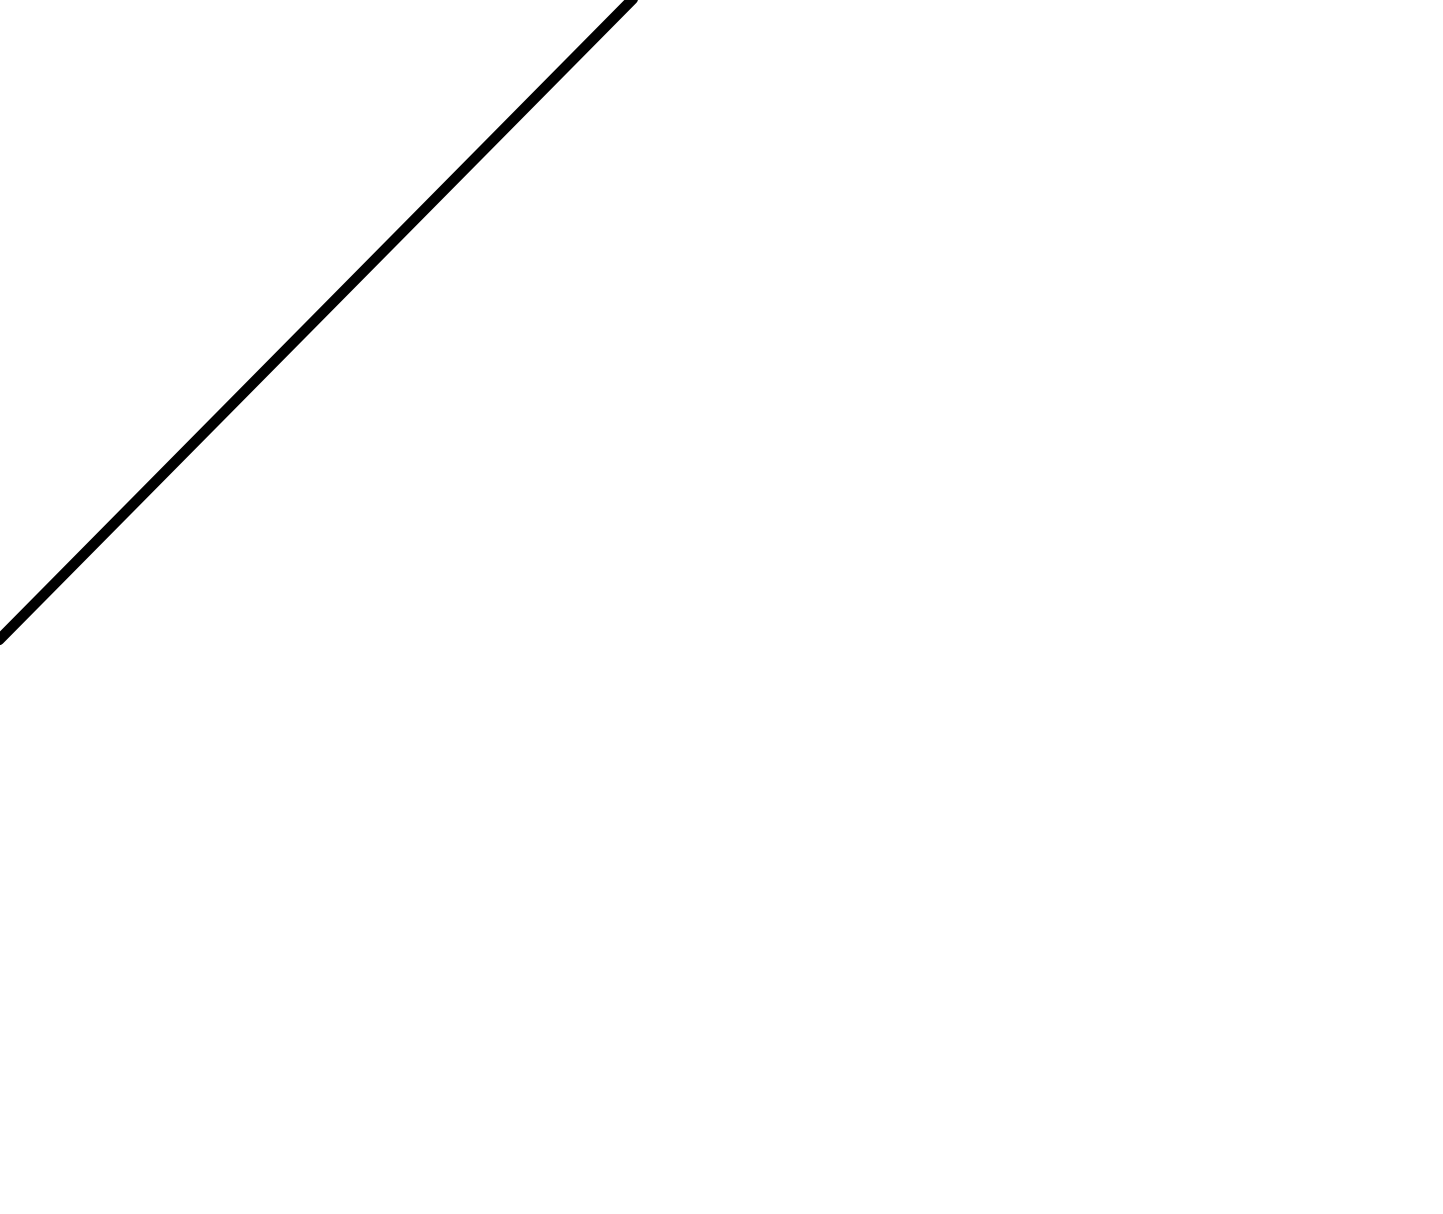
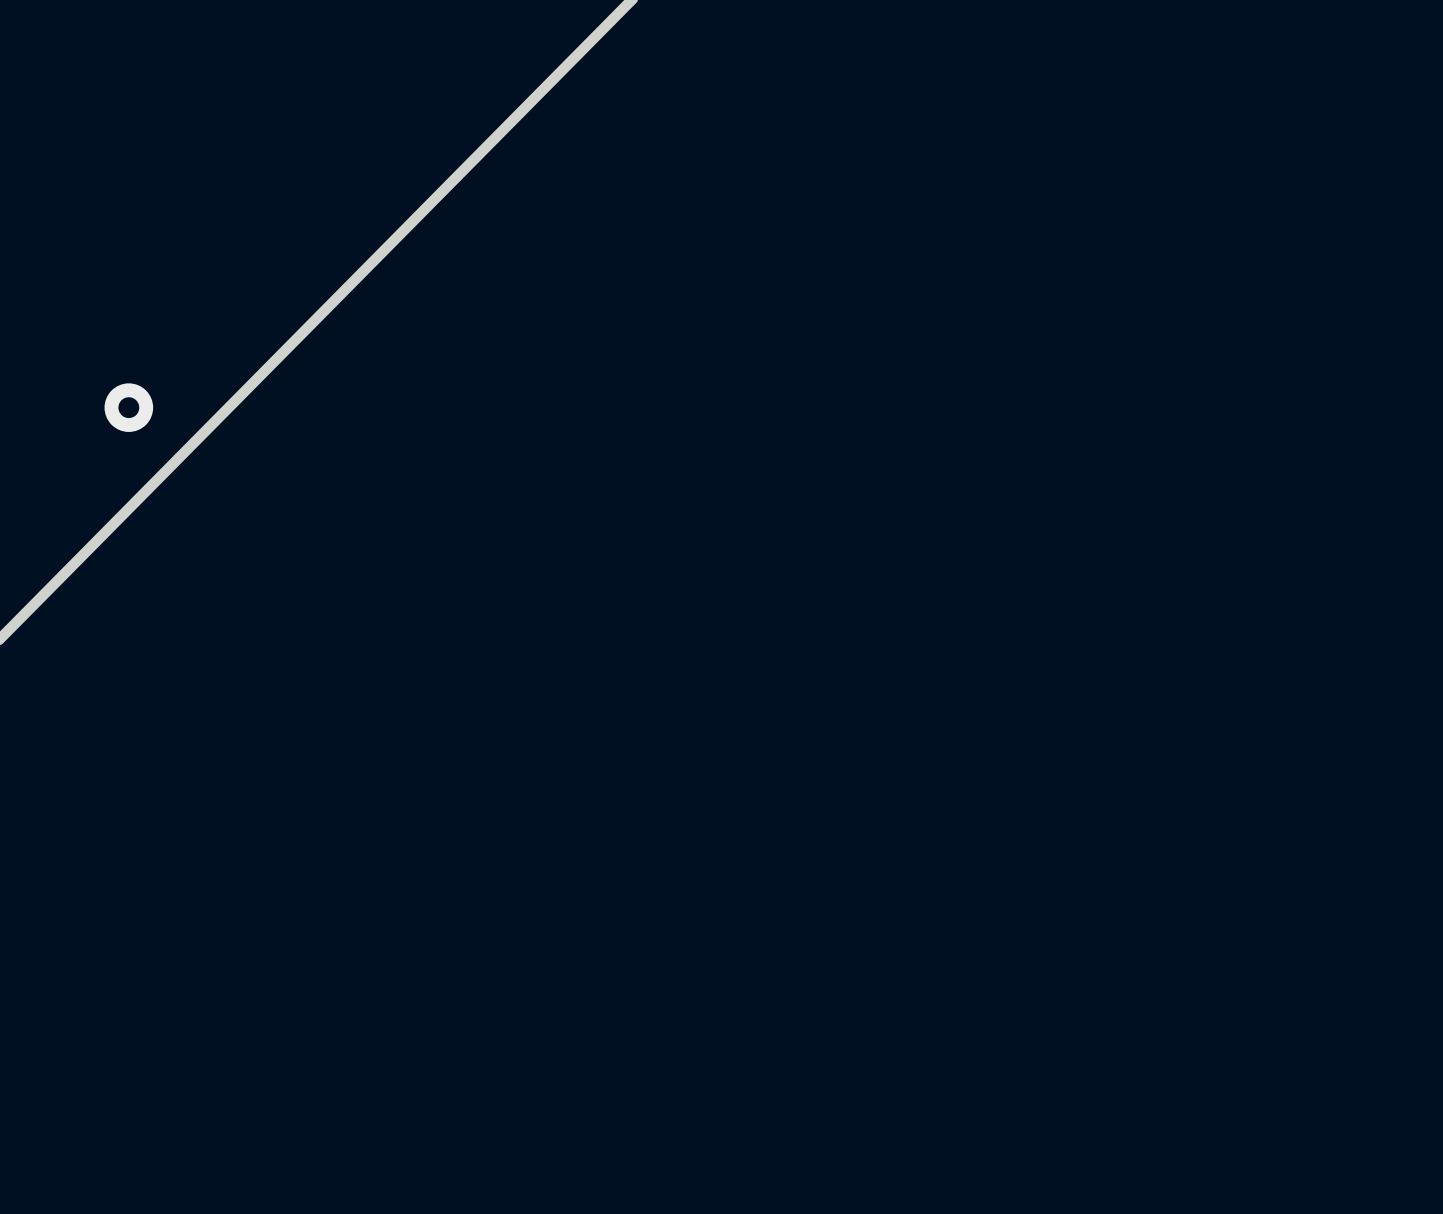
via: none -> (128, 407)

